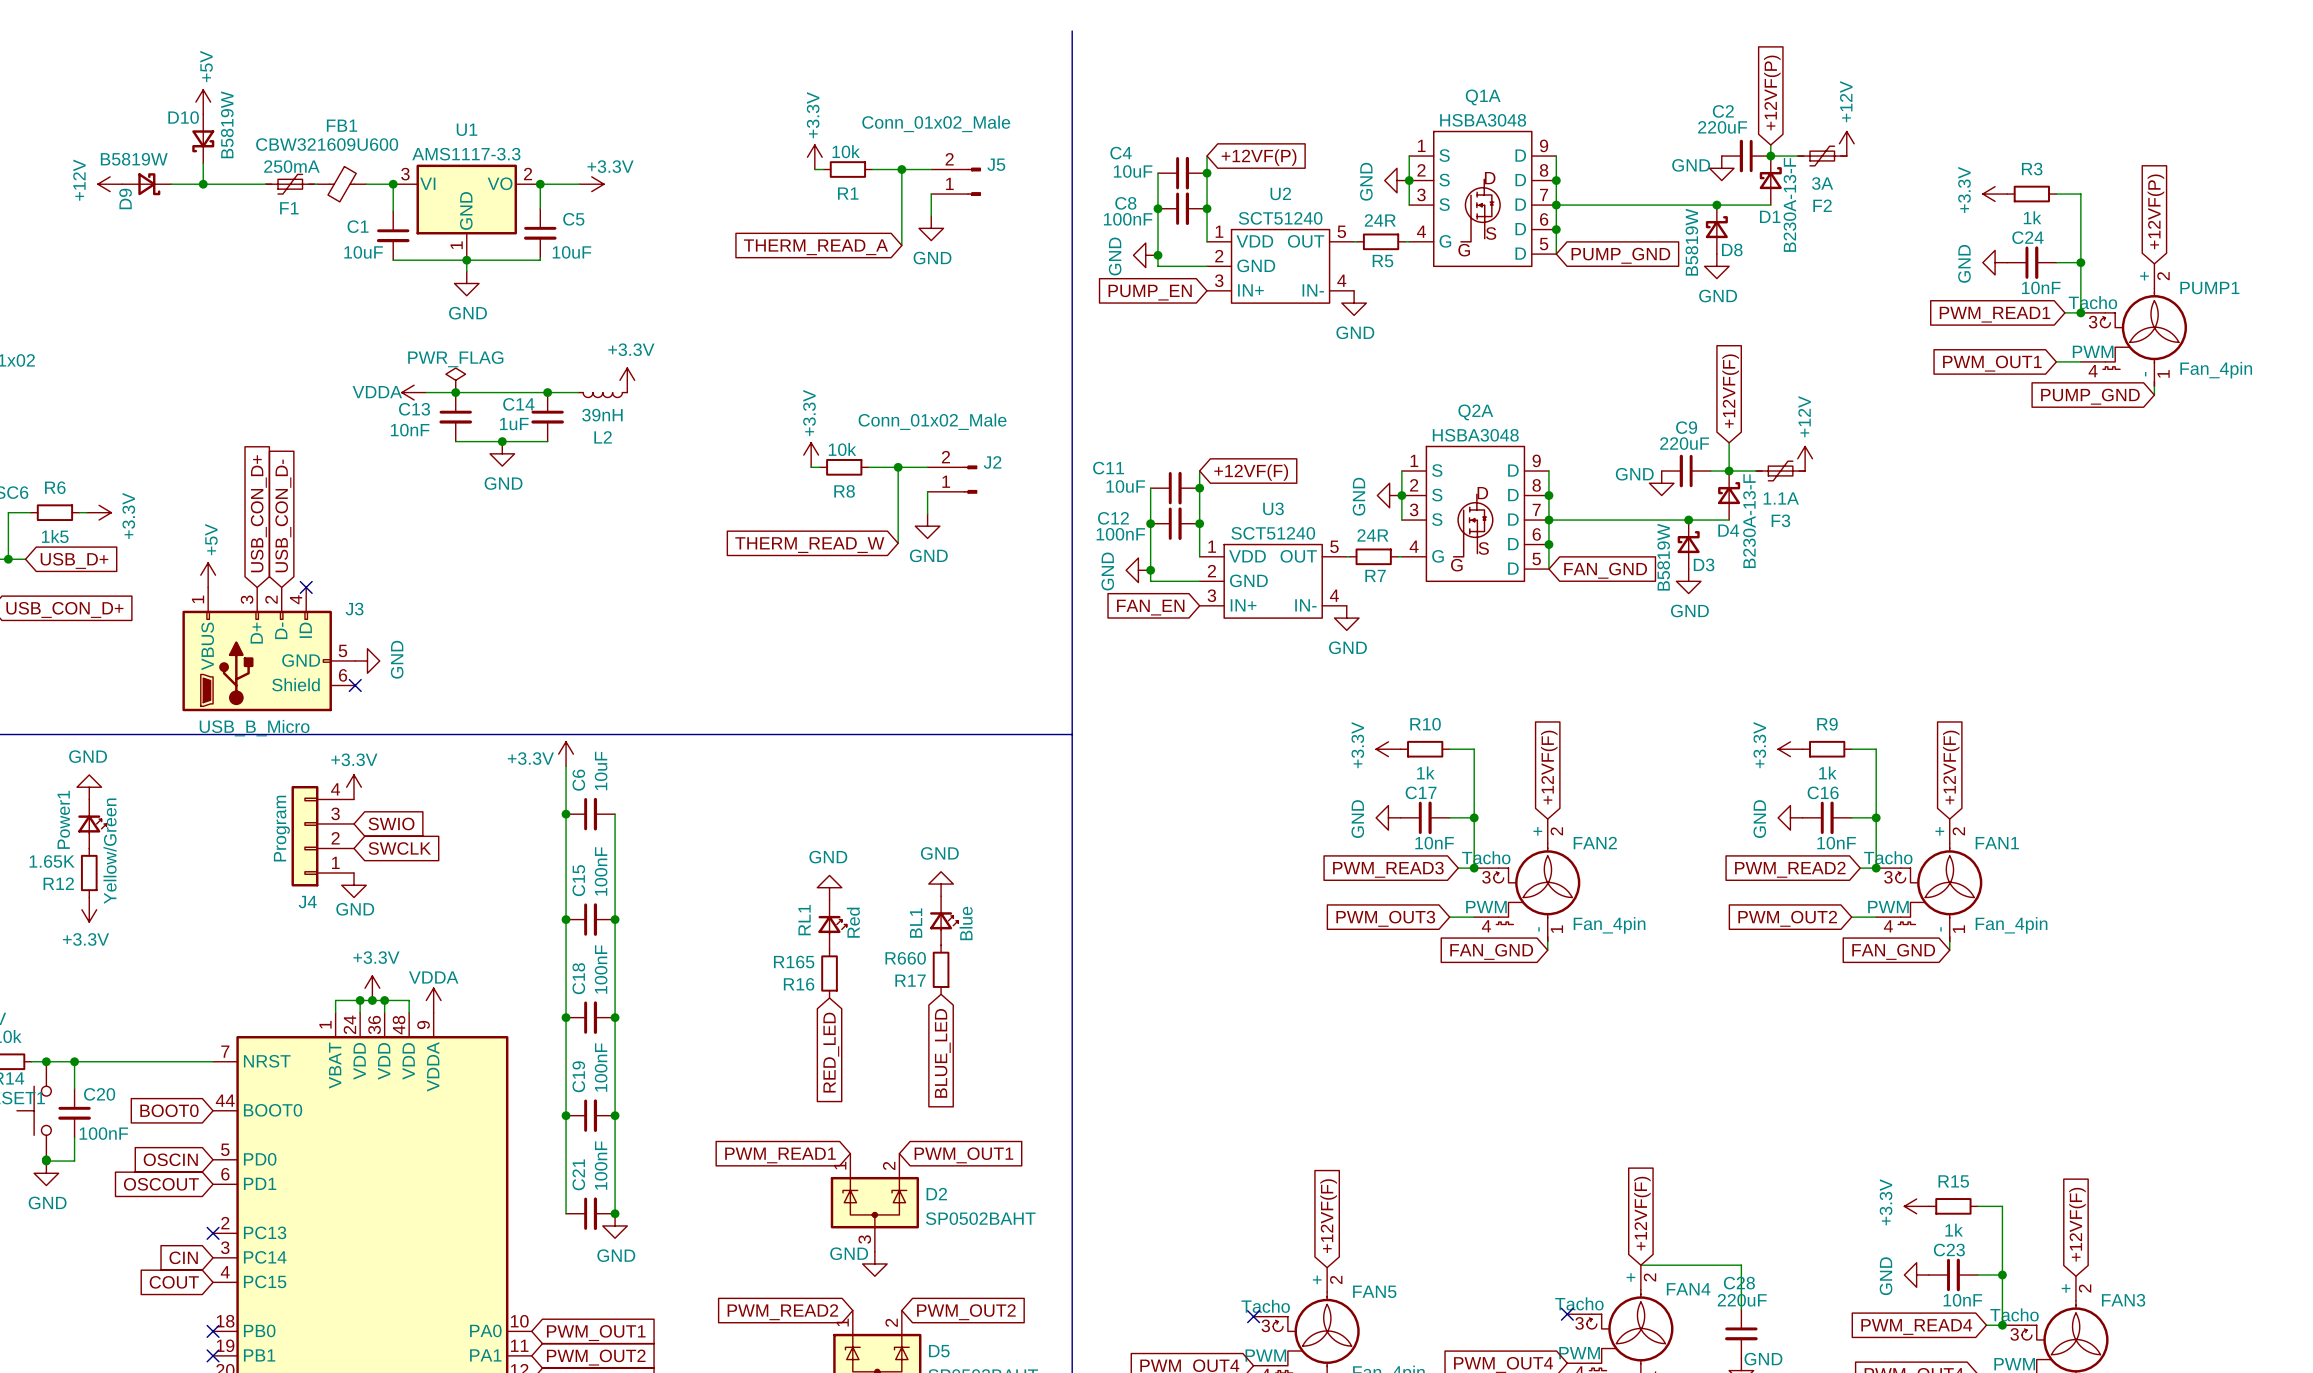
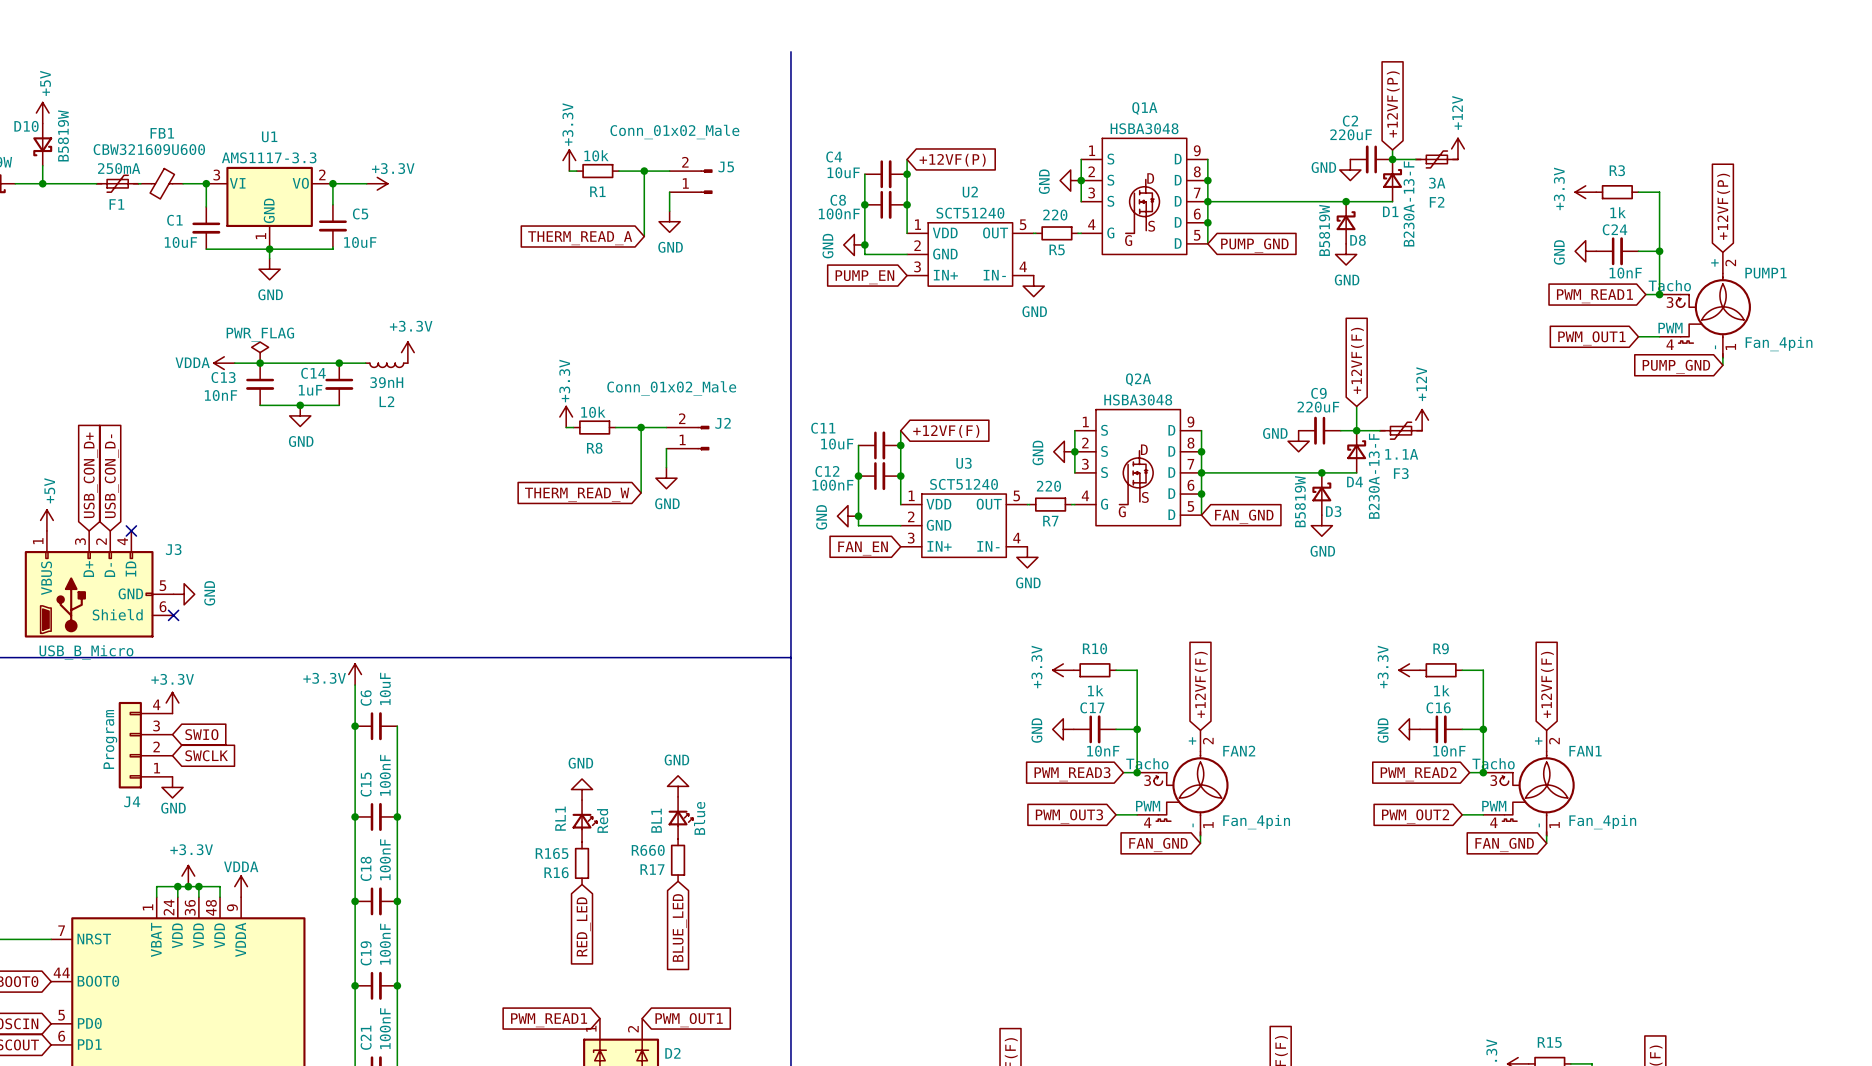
R5 value: 24R (1380, 220) -> 220 (1055, 215)
R7 value: 24R (1372, 535) -> 220 (1048, 486)

